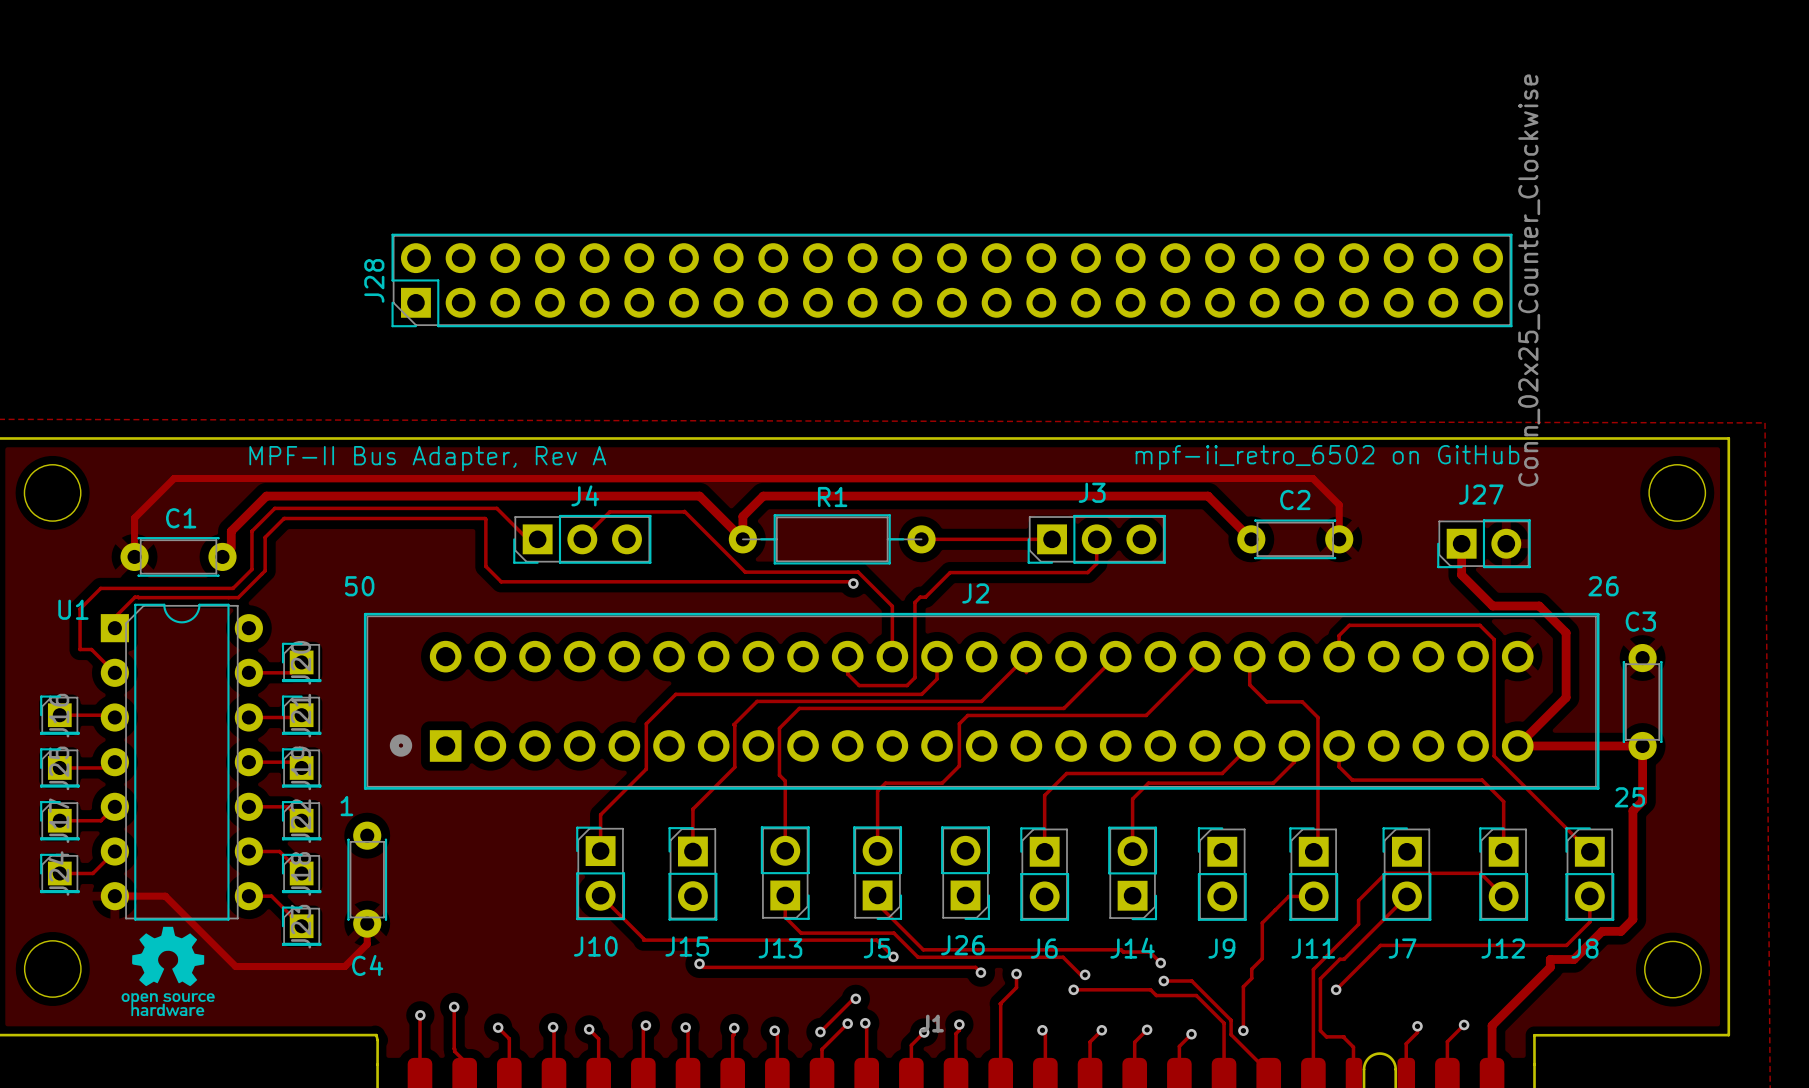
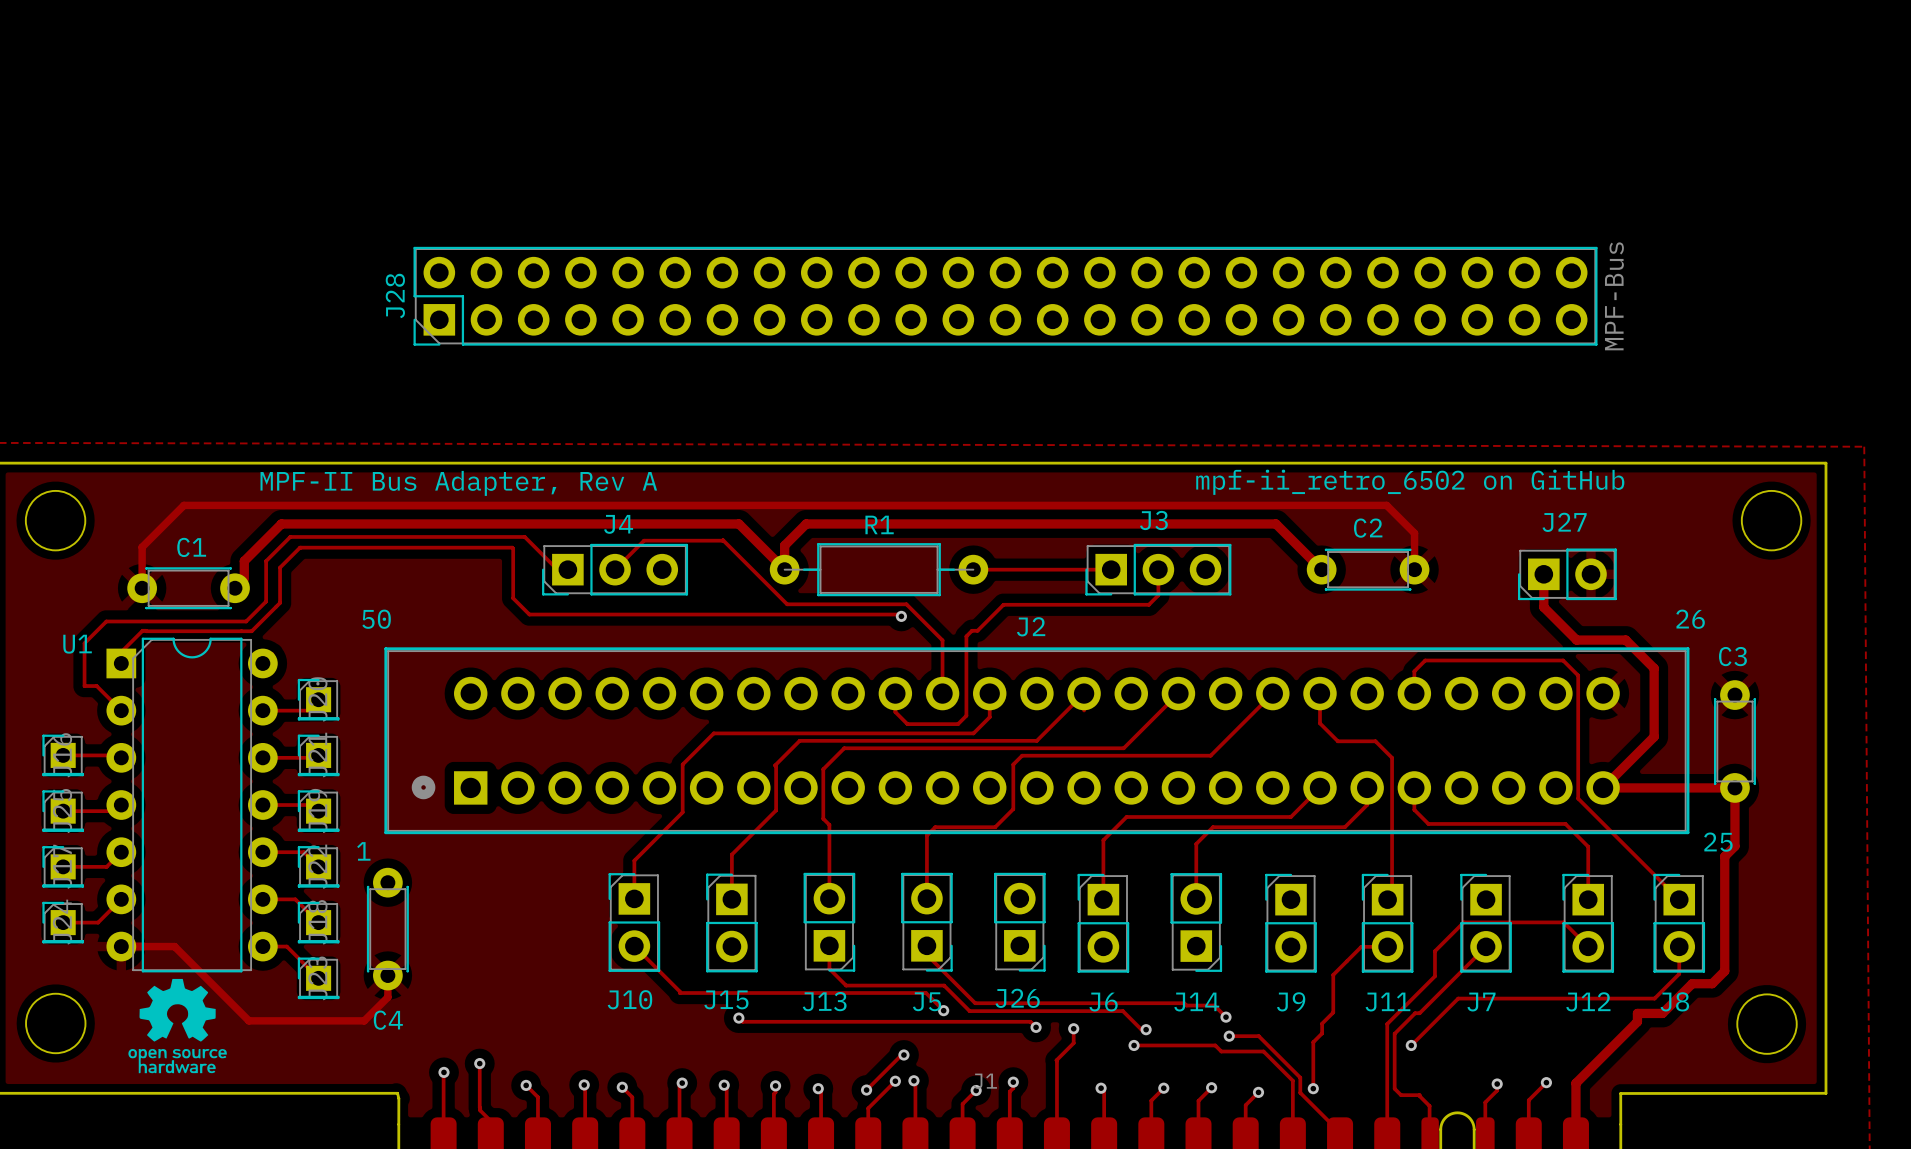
J28 value: Conn_02x25_Counter_Clockwise (1529, 280) -> MPF-Bus (1614, 296)

